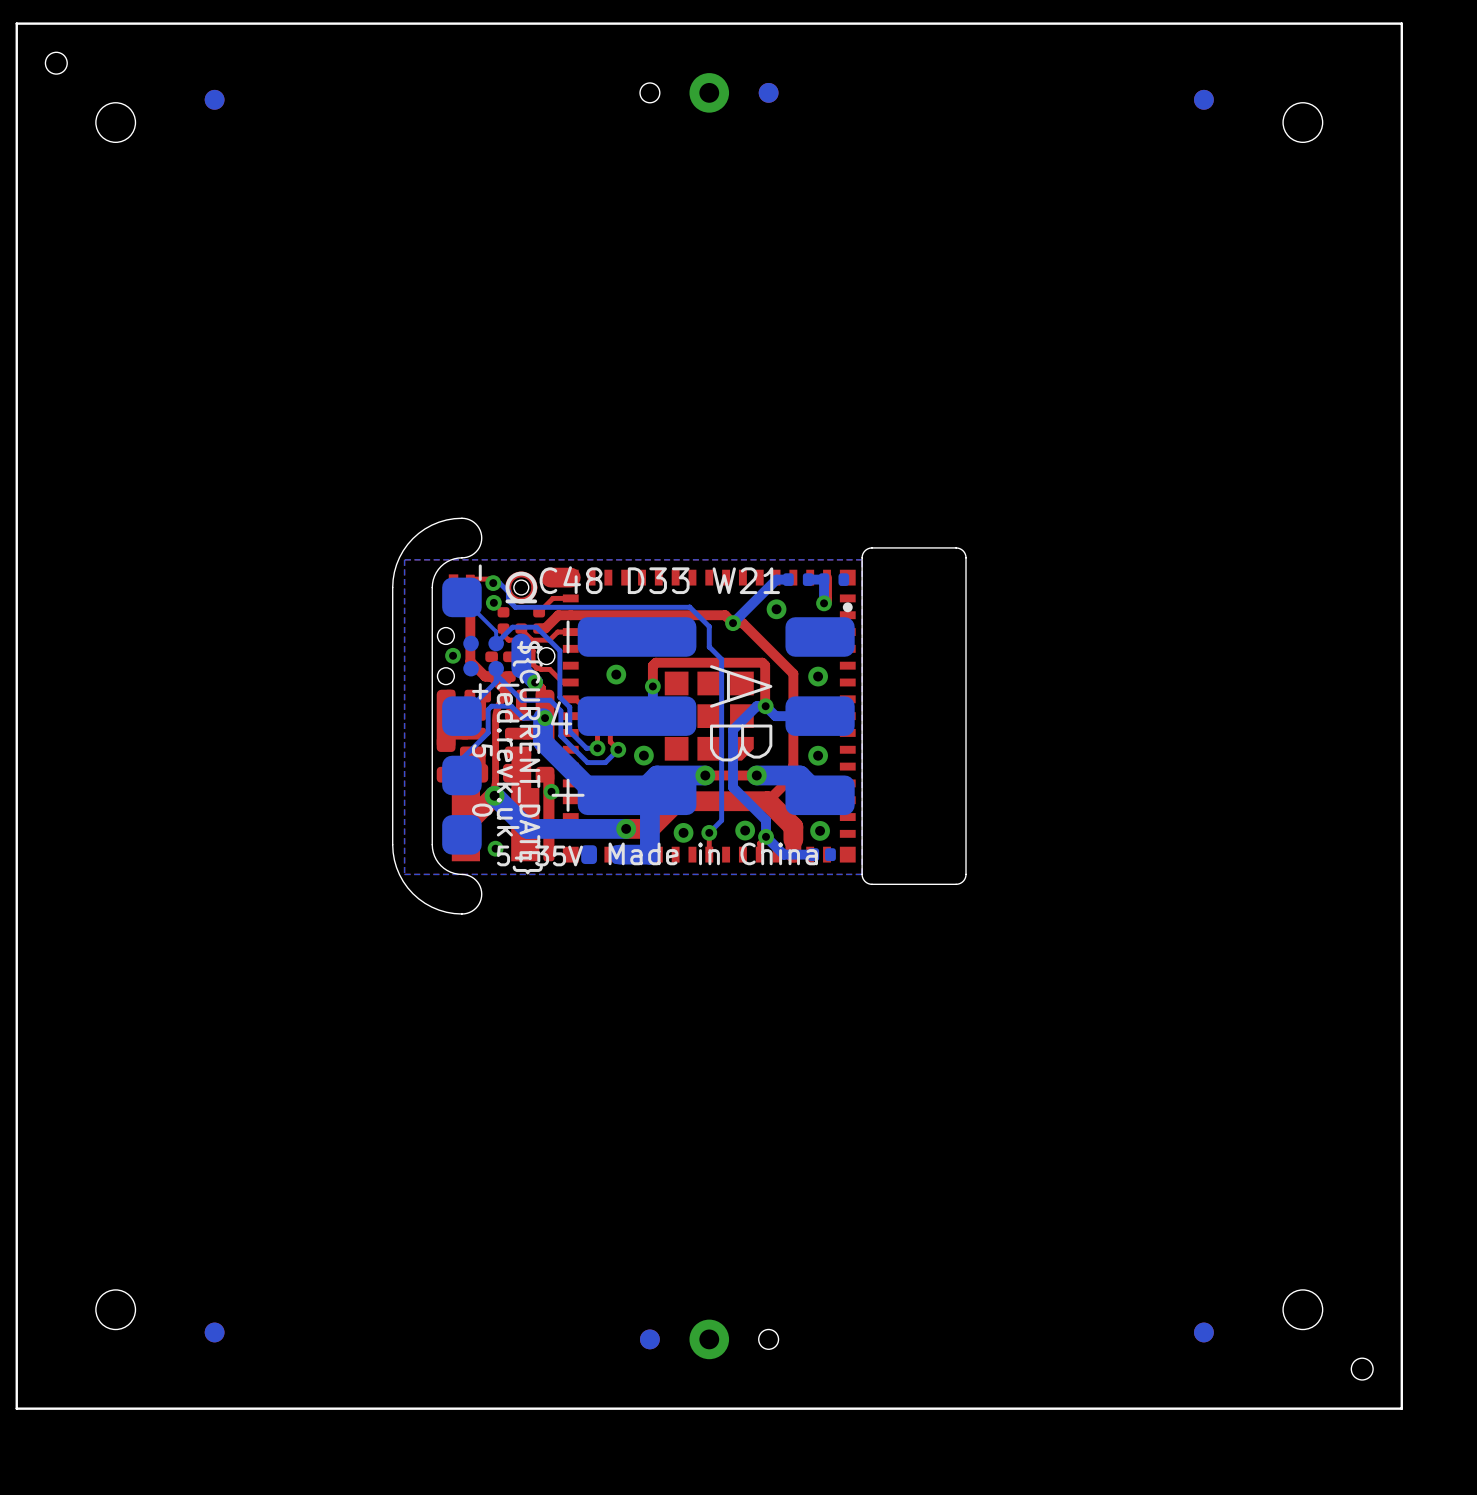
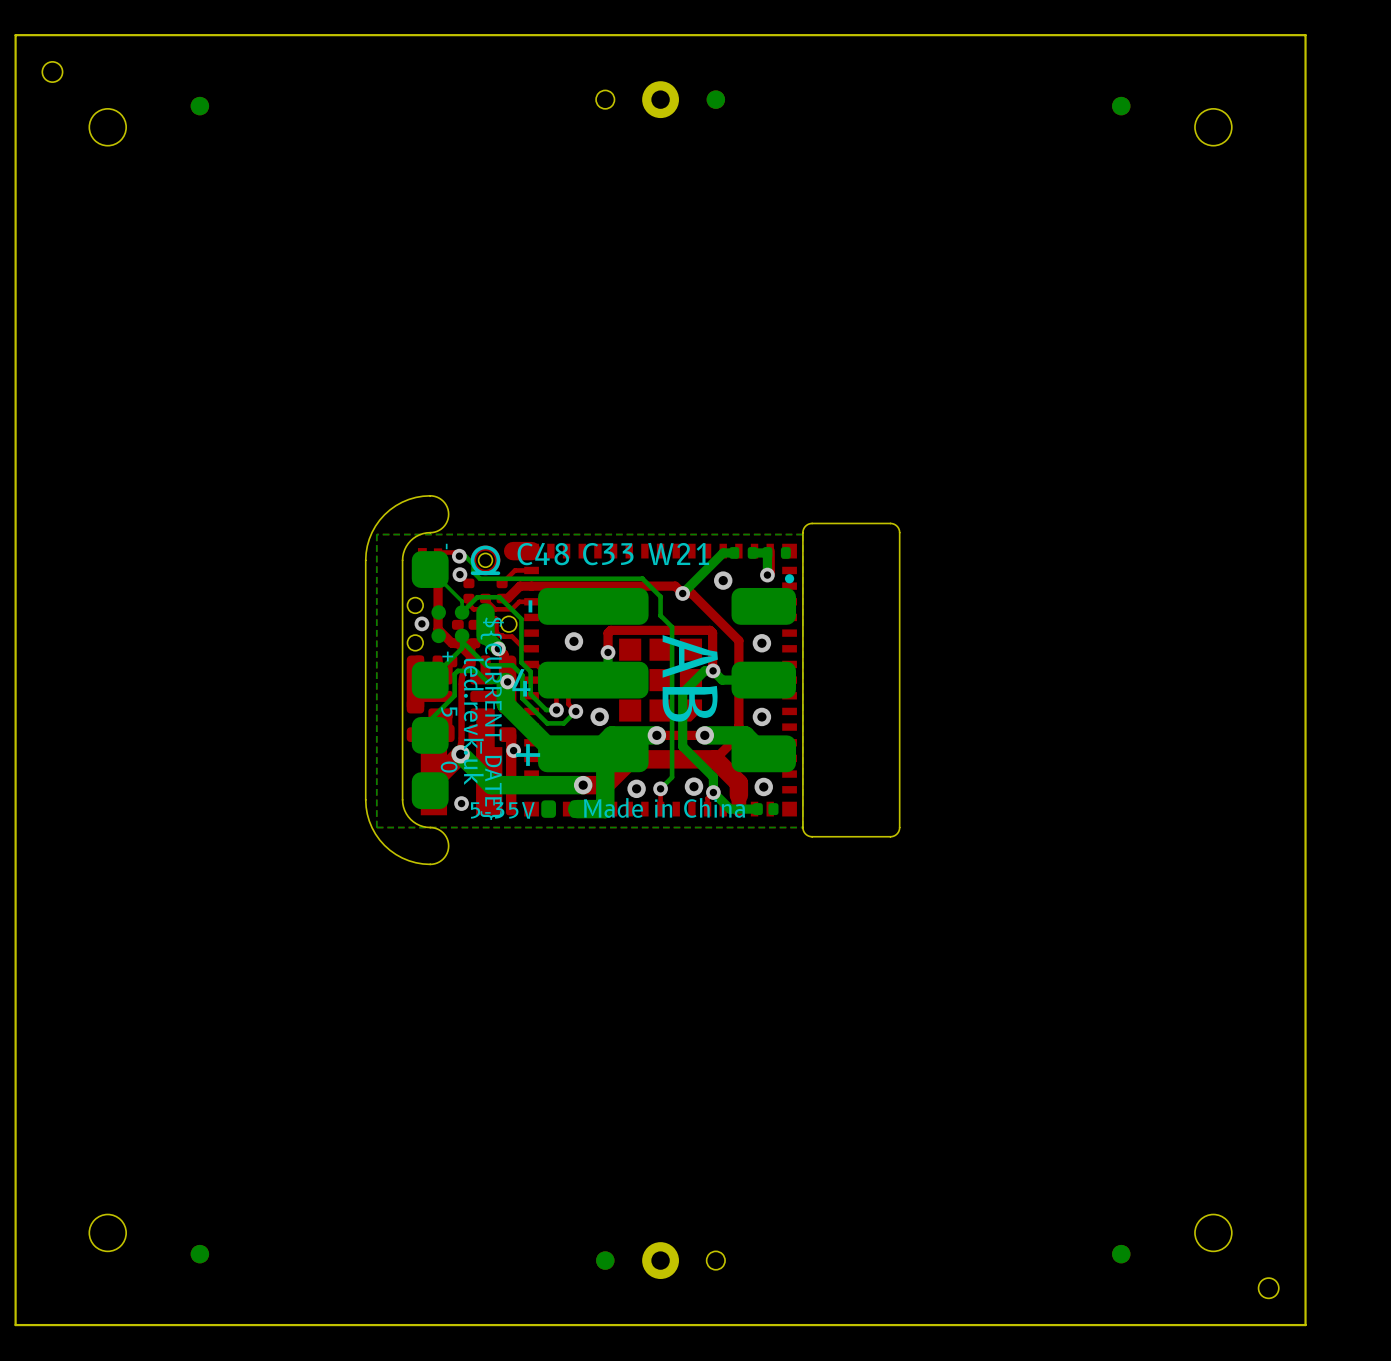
text: C48 D33 W21 (659, 580) -> C48 C33 W21 (613, 554)

